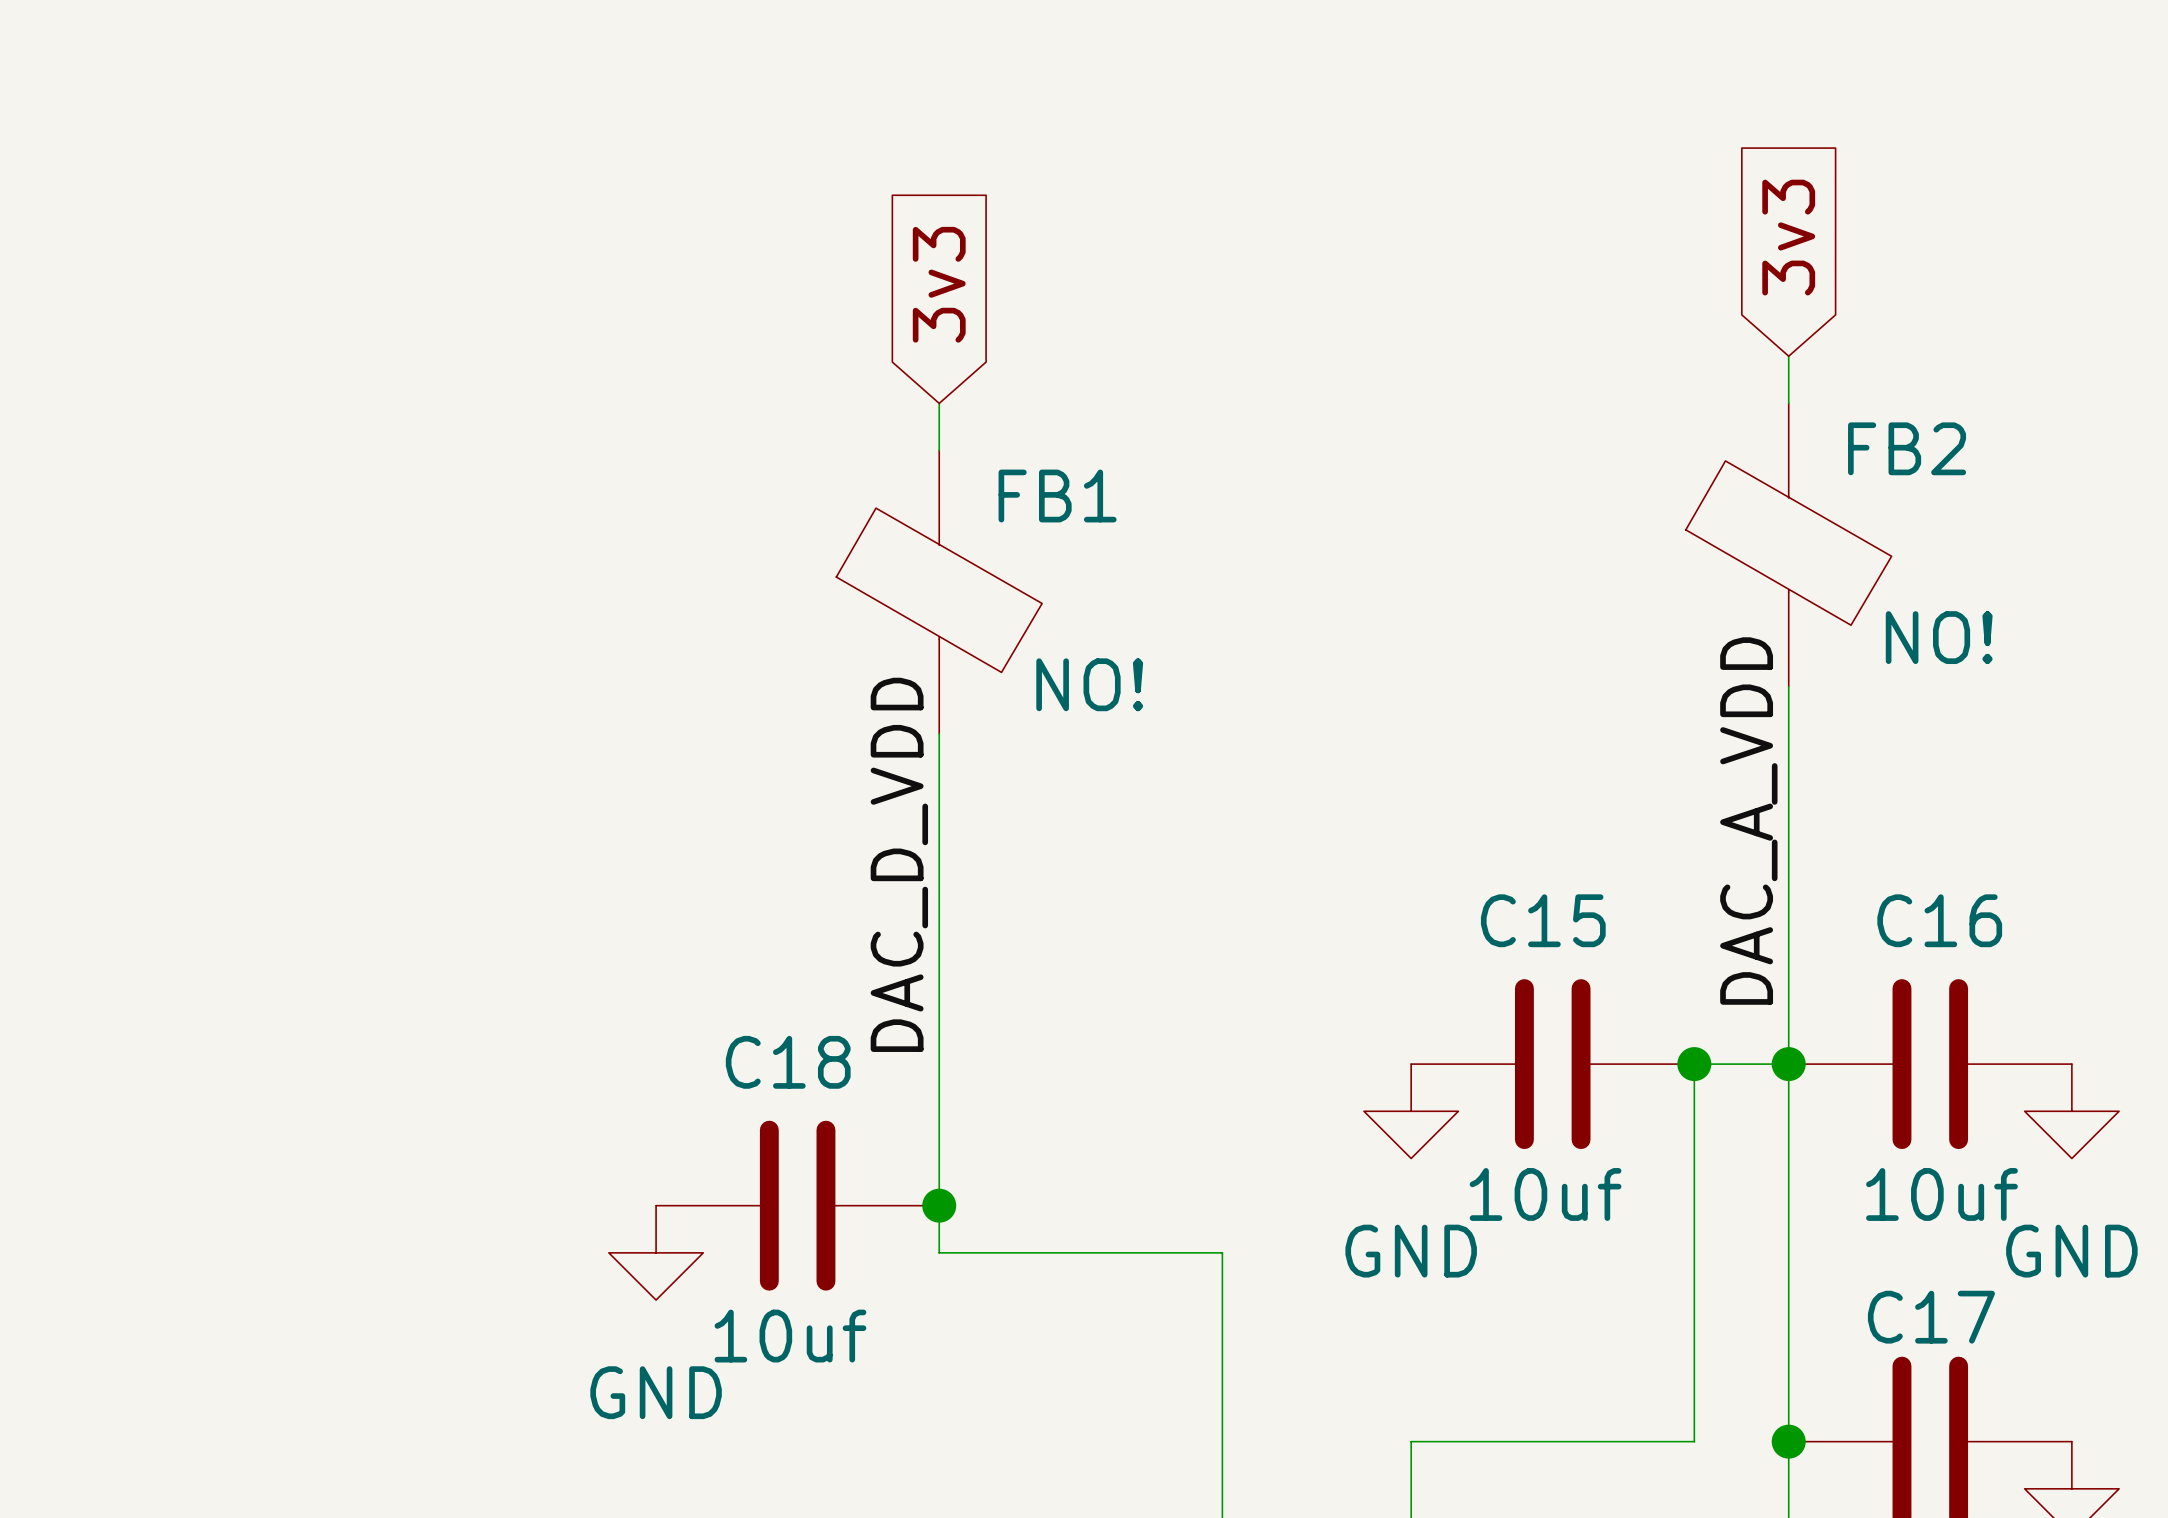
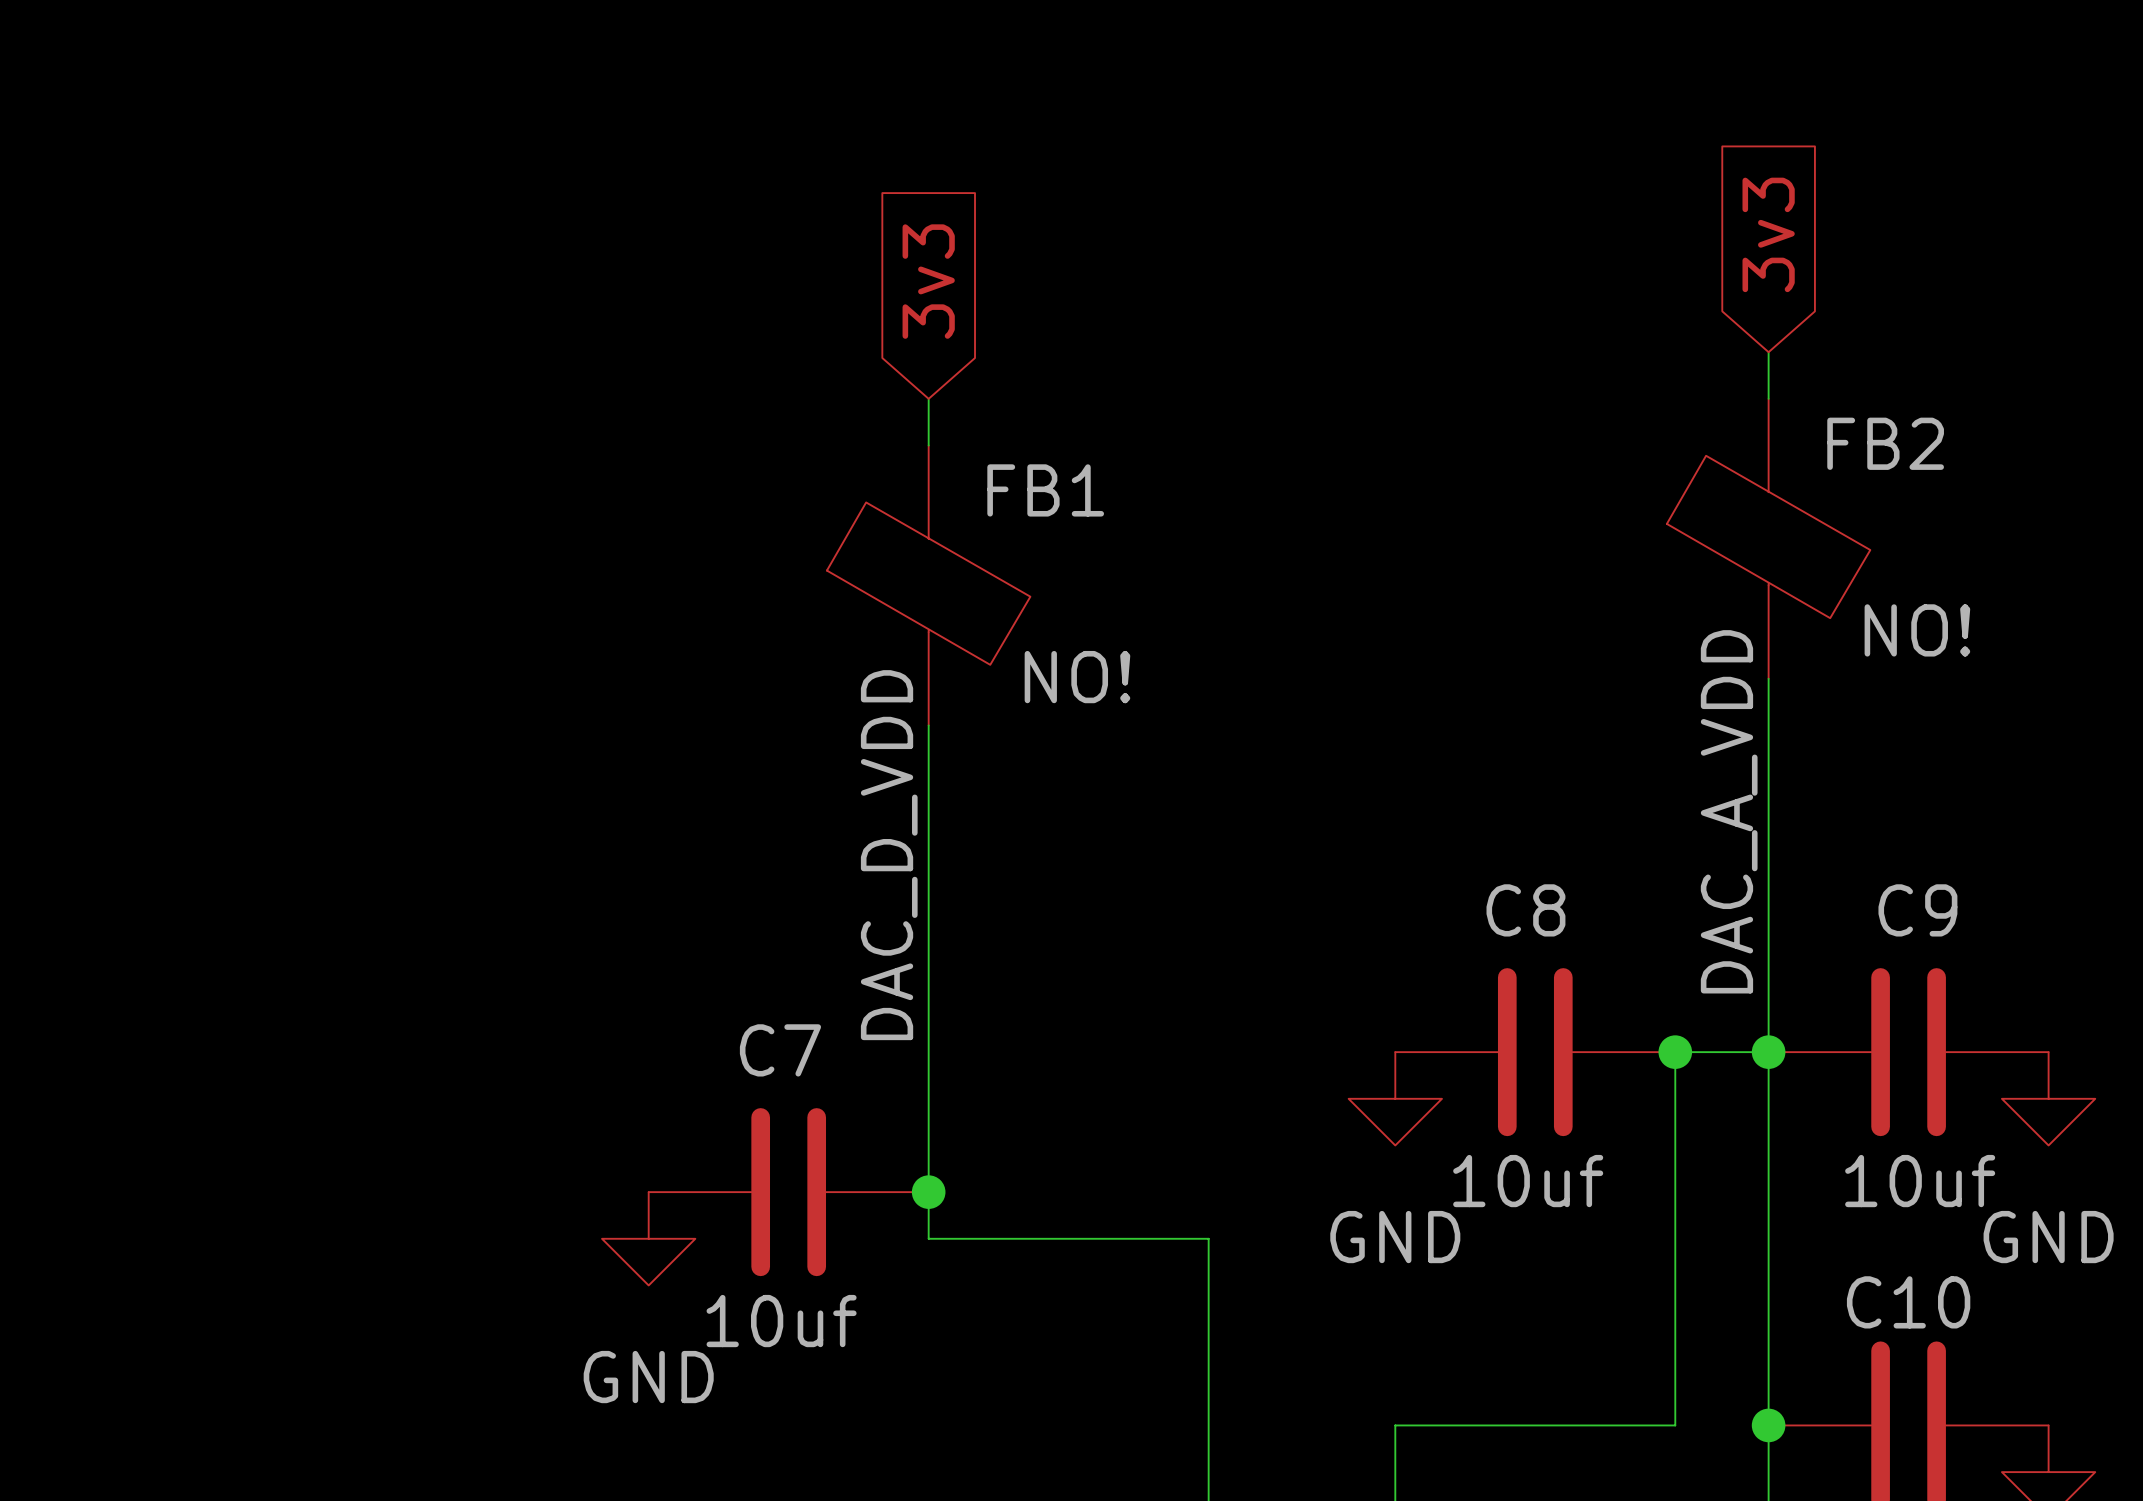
C15 name: C15 (1543, 920) -> C8 (1525, 910)
C16 name: C16 (1939, 920) -> C9 (1917, 910)
C18 name: C18 (788, 1062) -> C7 (780, 1050)
C17 name: C17 (1931, 1317) -> C10 (1908, 1302)

